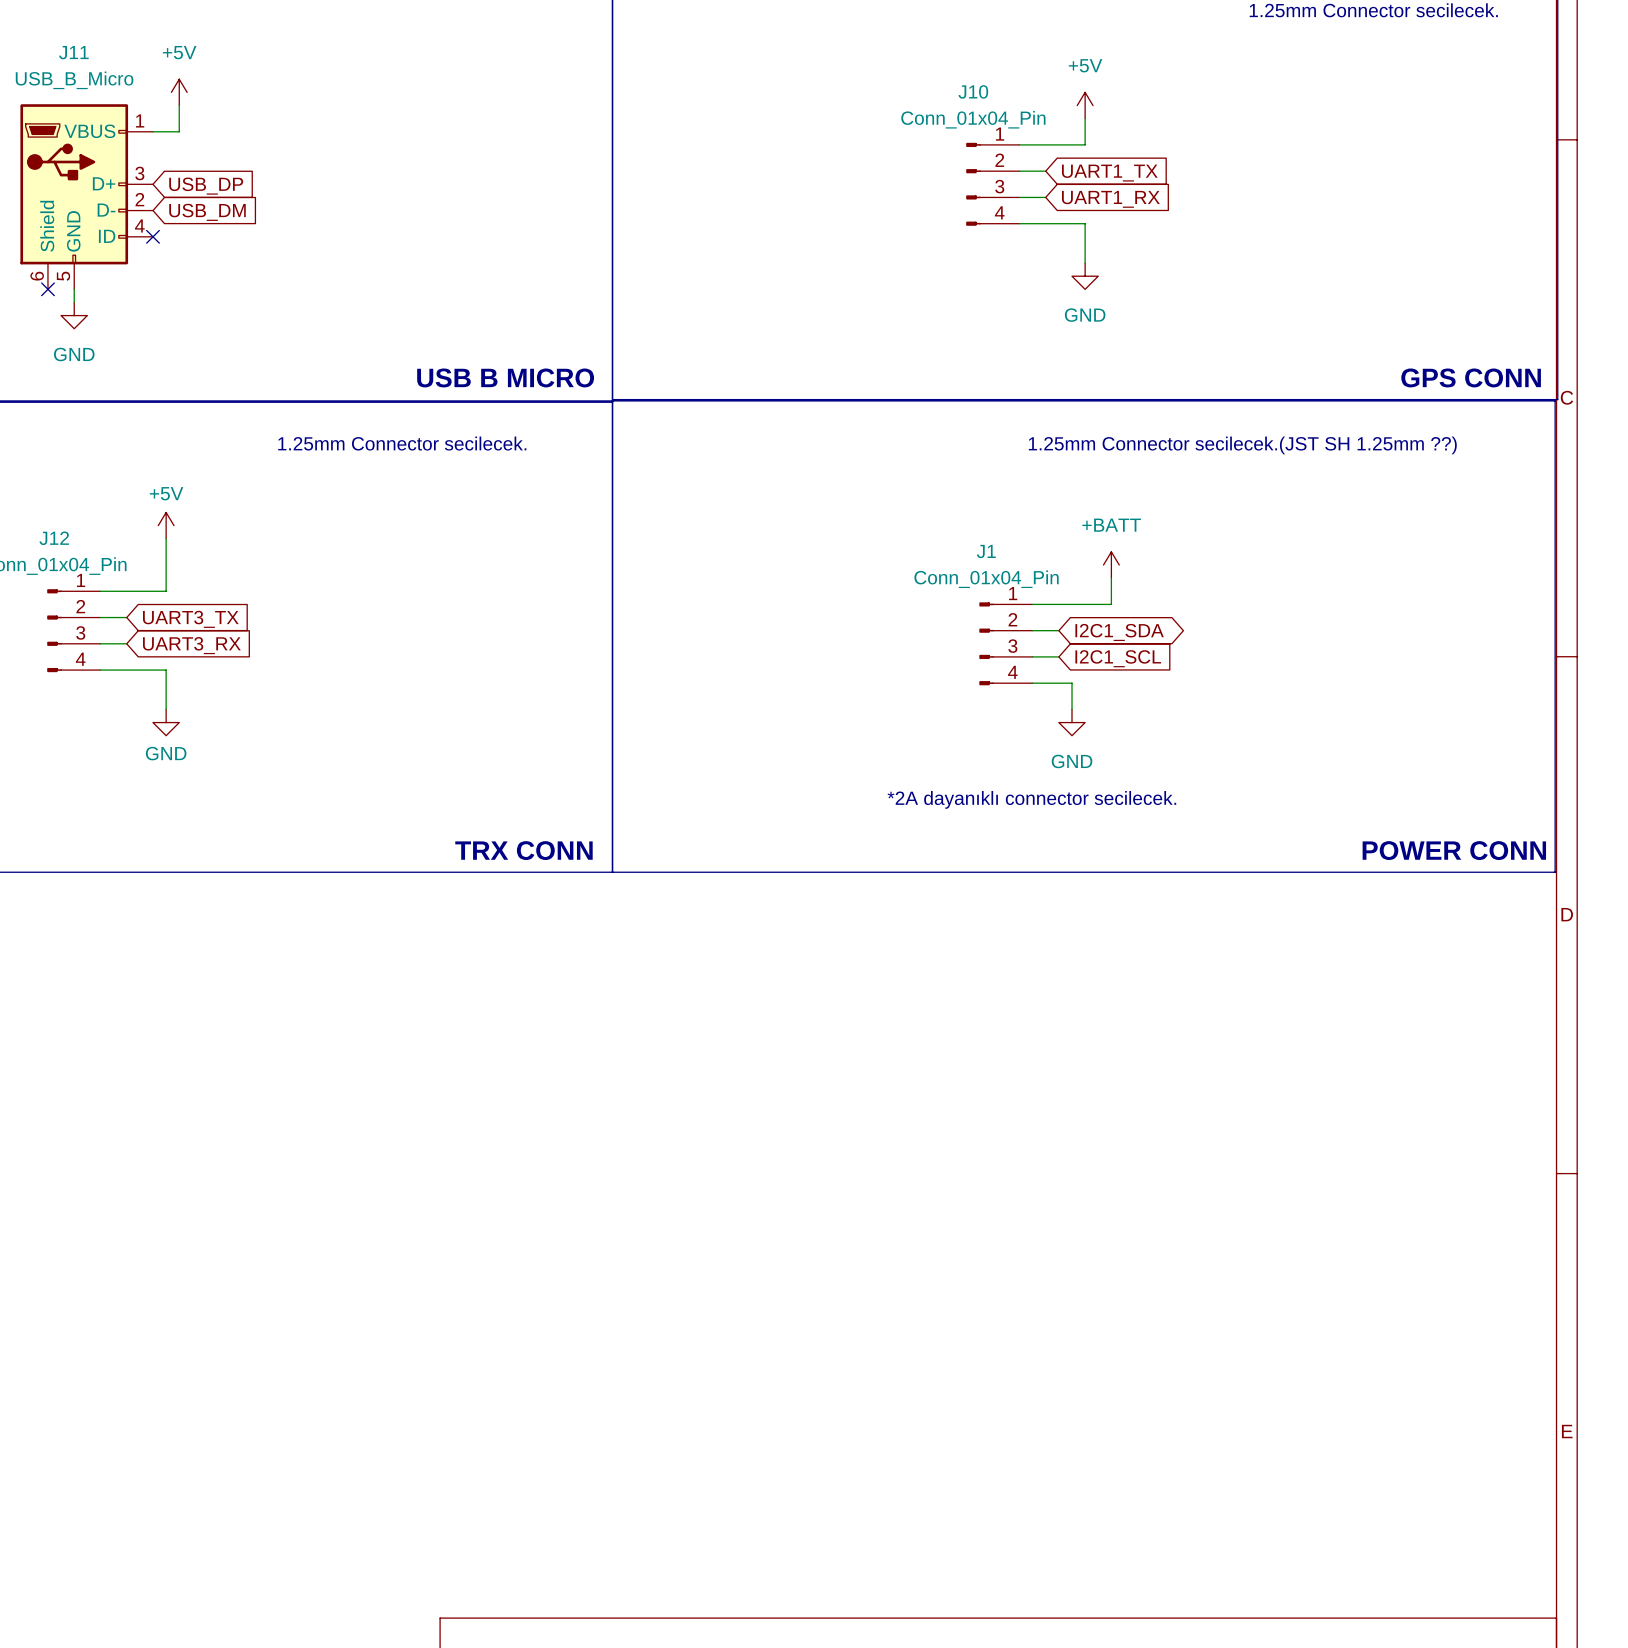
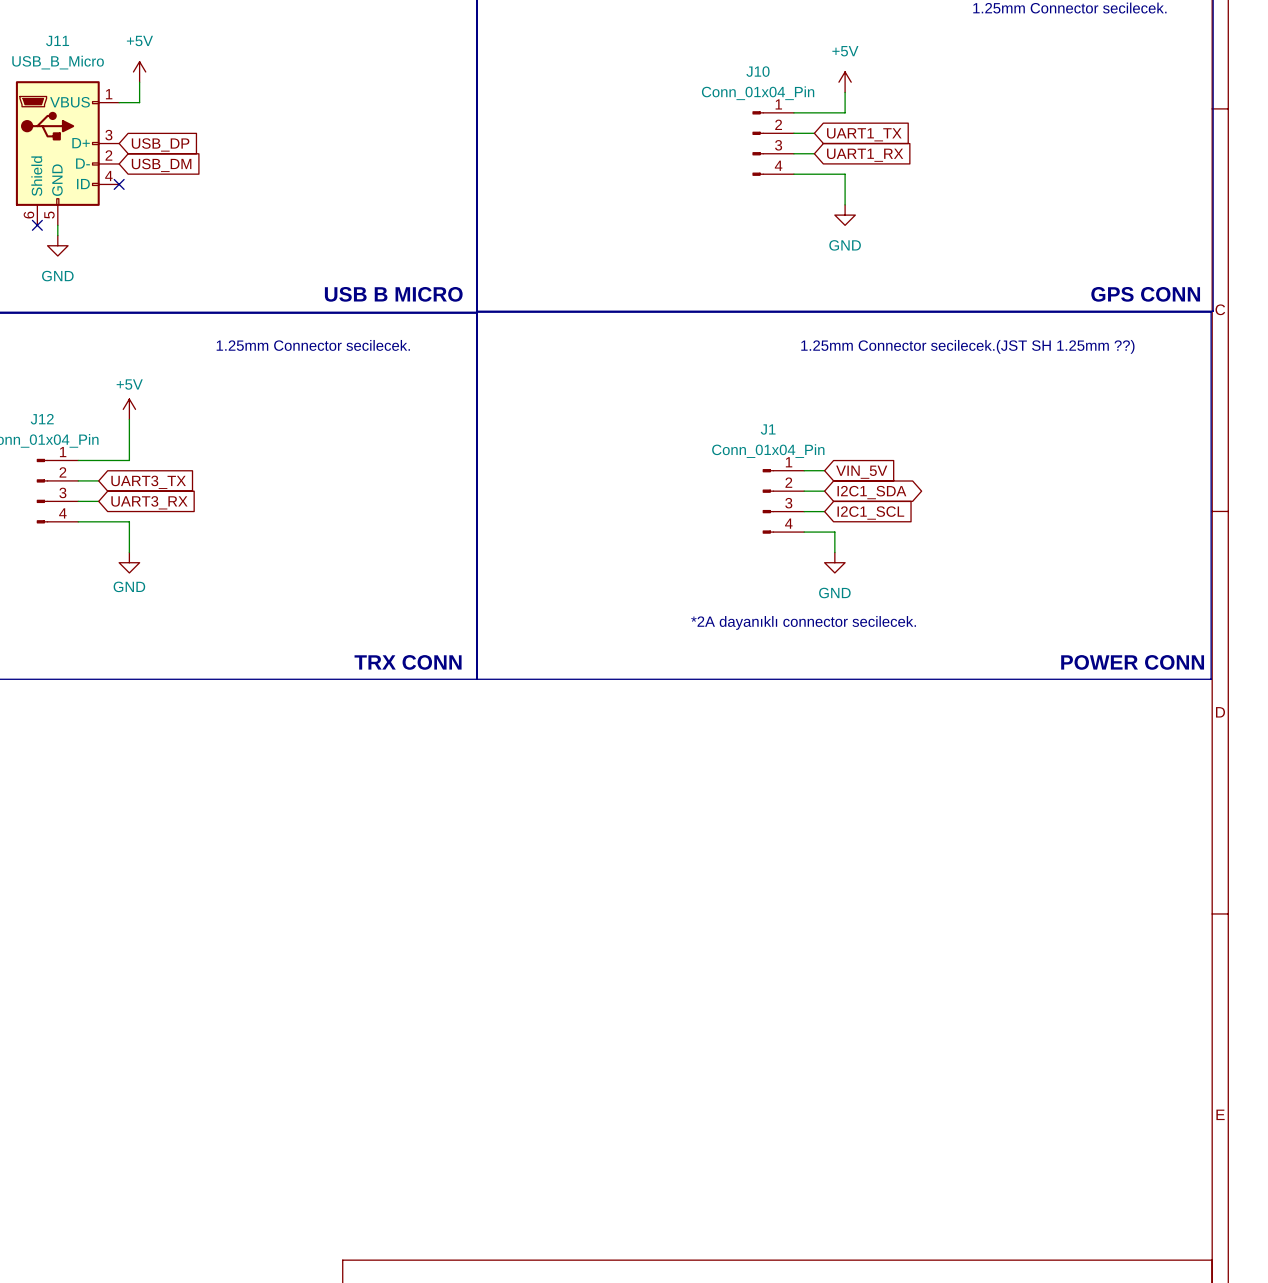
power symbol: +BATT (1111, 565) -> none
wire: (1111, 578) (1111, 604) (1058, 604) -> none
global label: none -> VIN_5V (861, 472)

